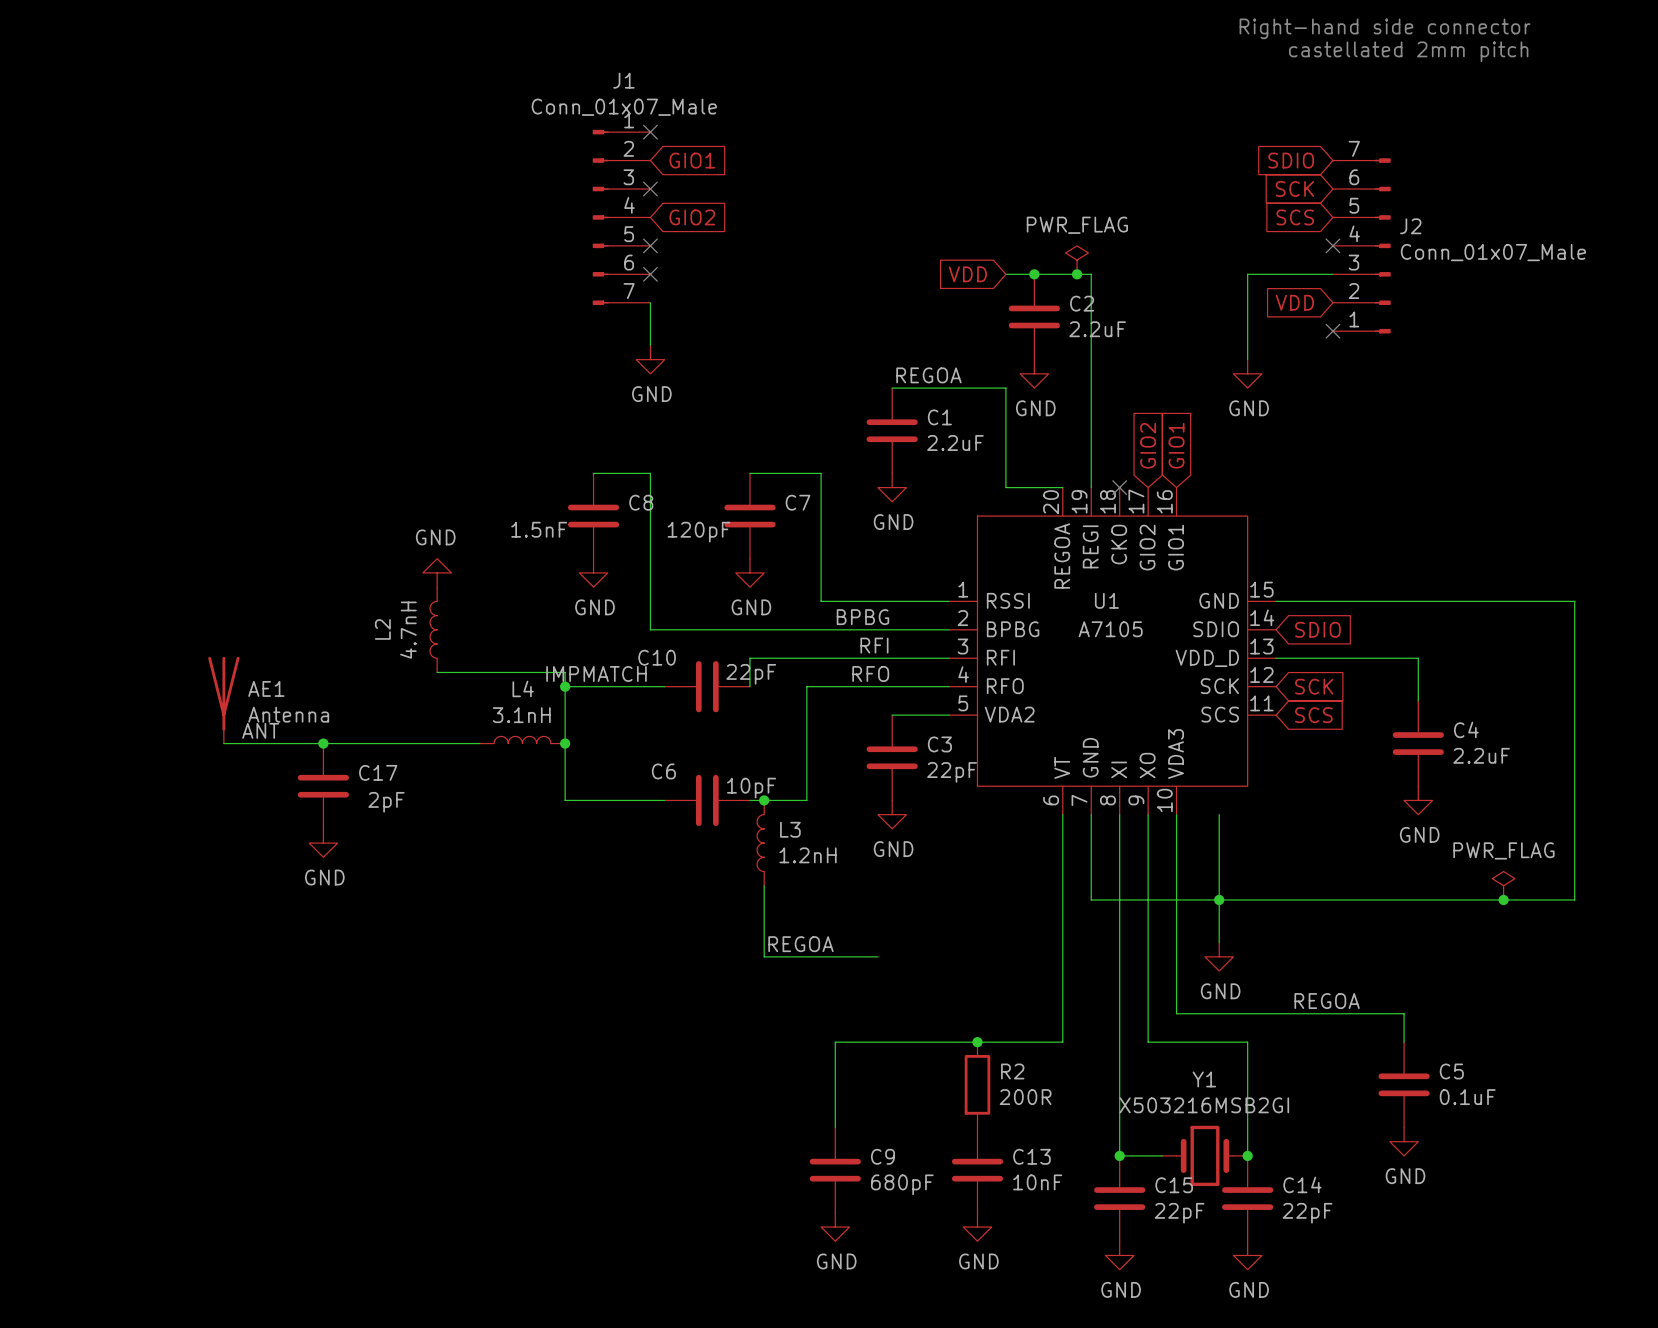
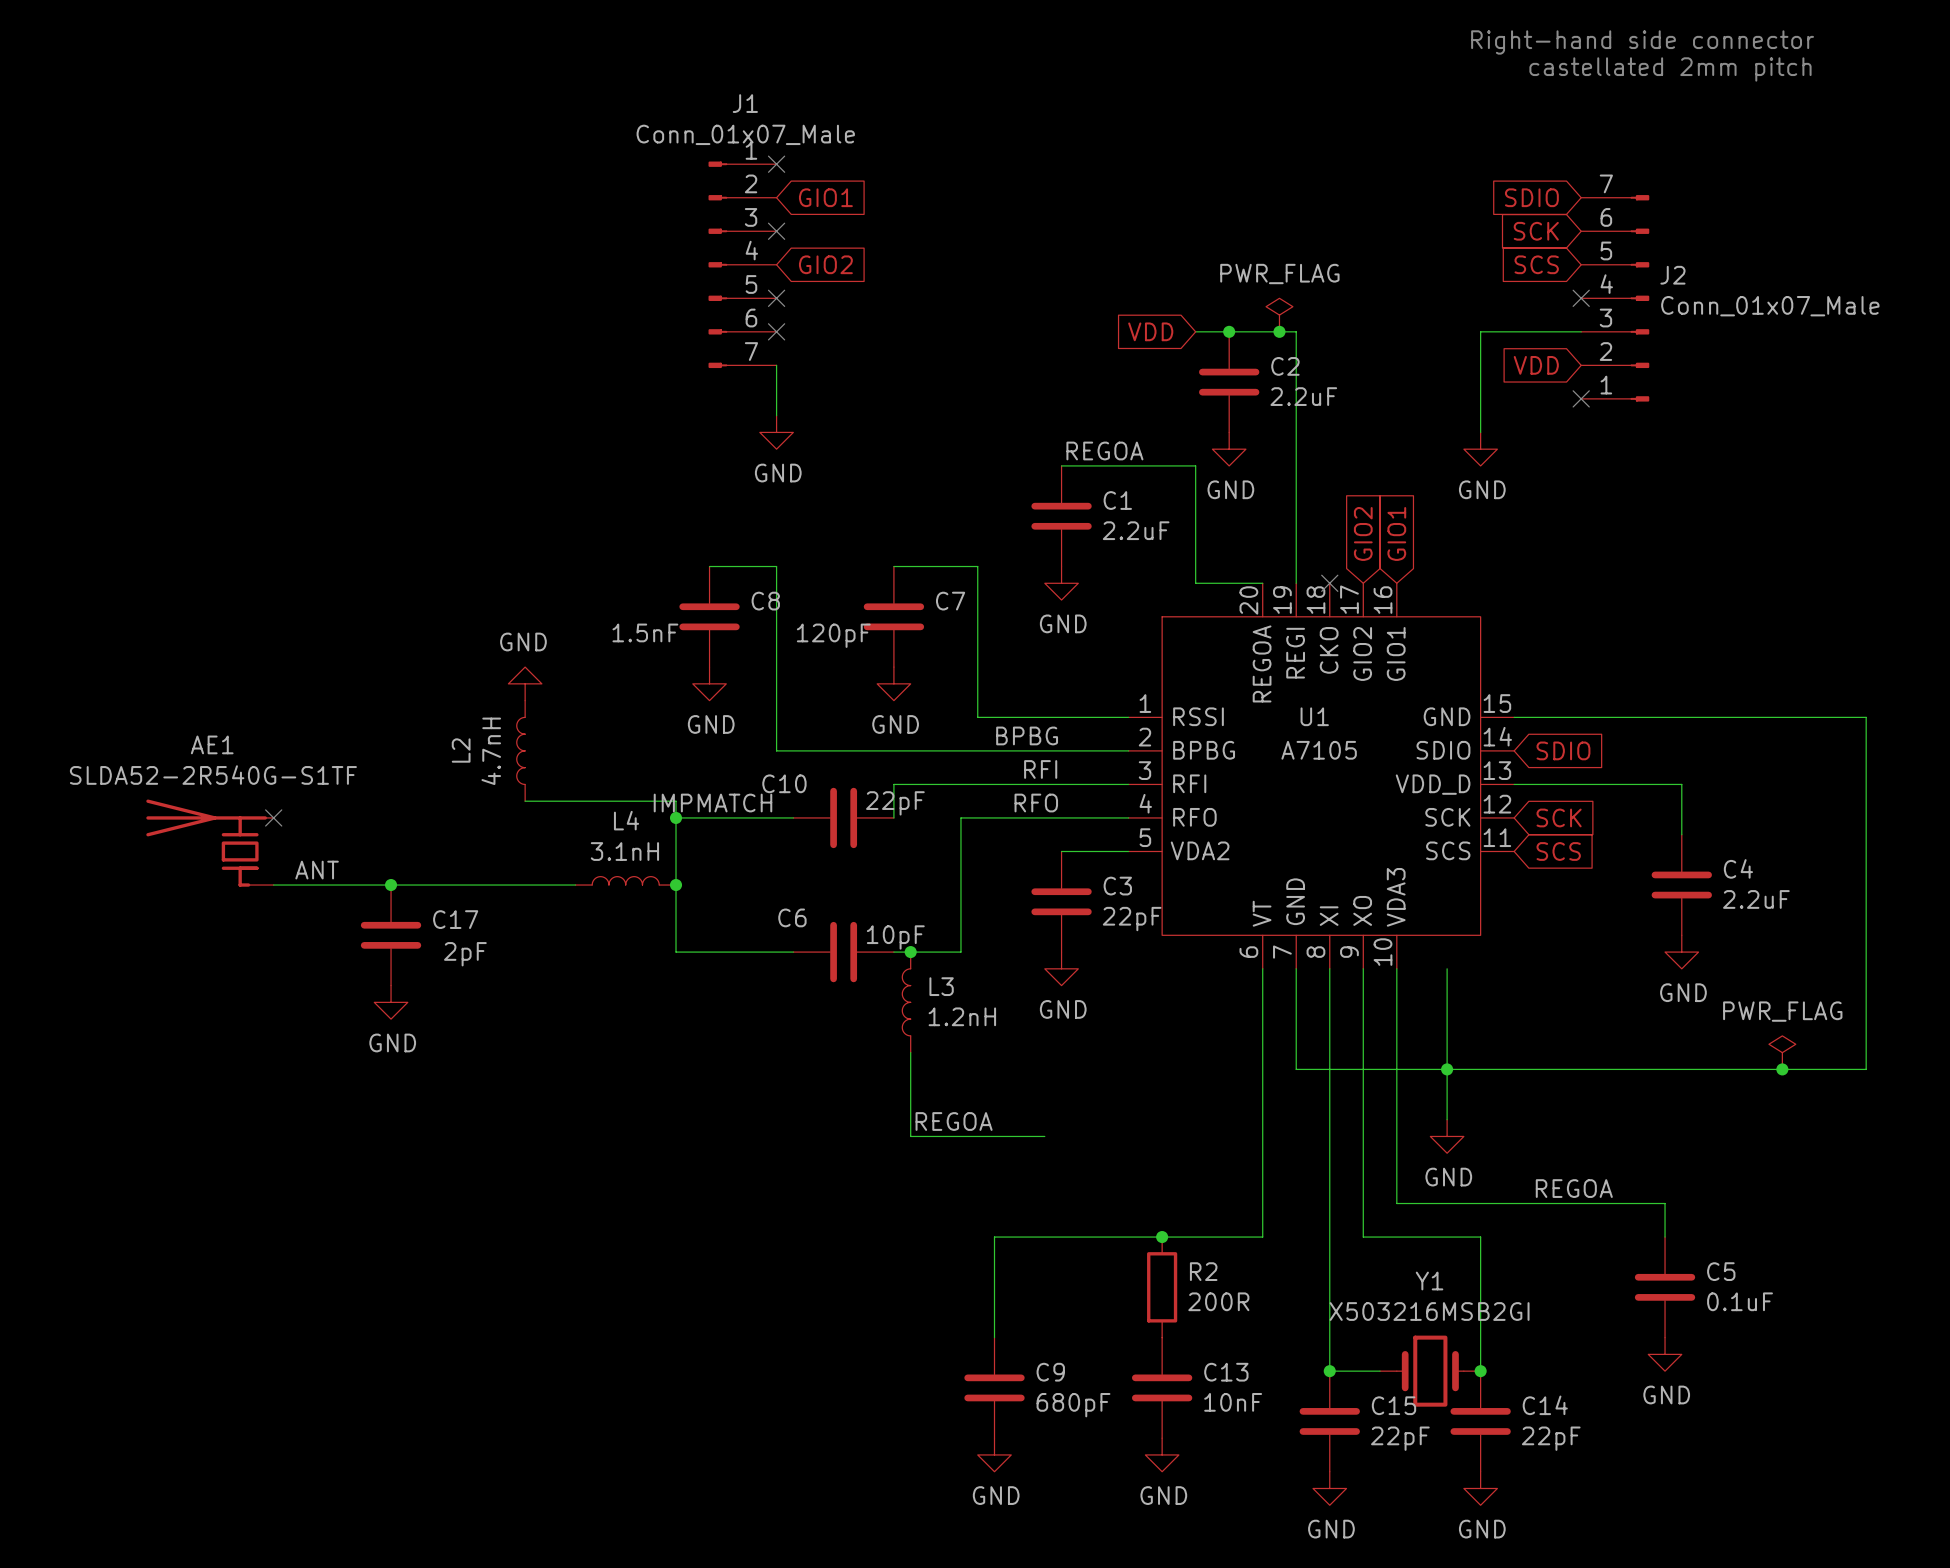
AE1 symbol: [208, 656, 240, 744] -> [146, 799, 274, 887]
no-connect mark: none -> (273, 817)
AE1 name position: AE1 (266, 688) -> AE1 (212, 744)
AE1 value: Antenna (288, 714) -> SLDA52-2R540G-S1TF (213, 775)

